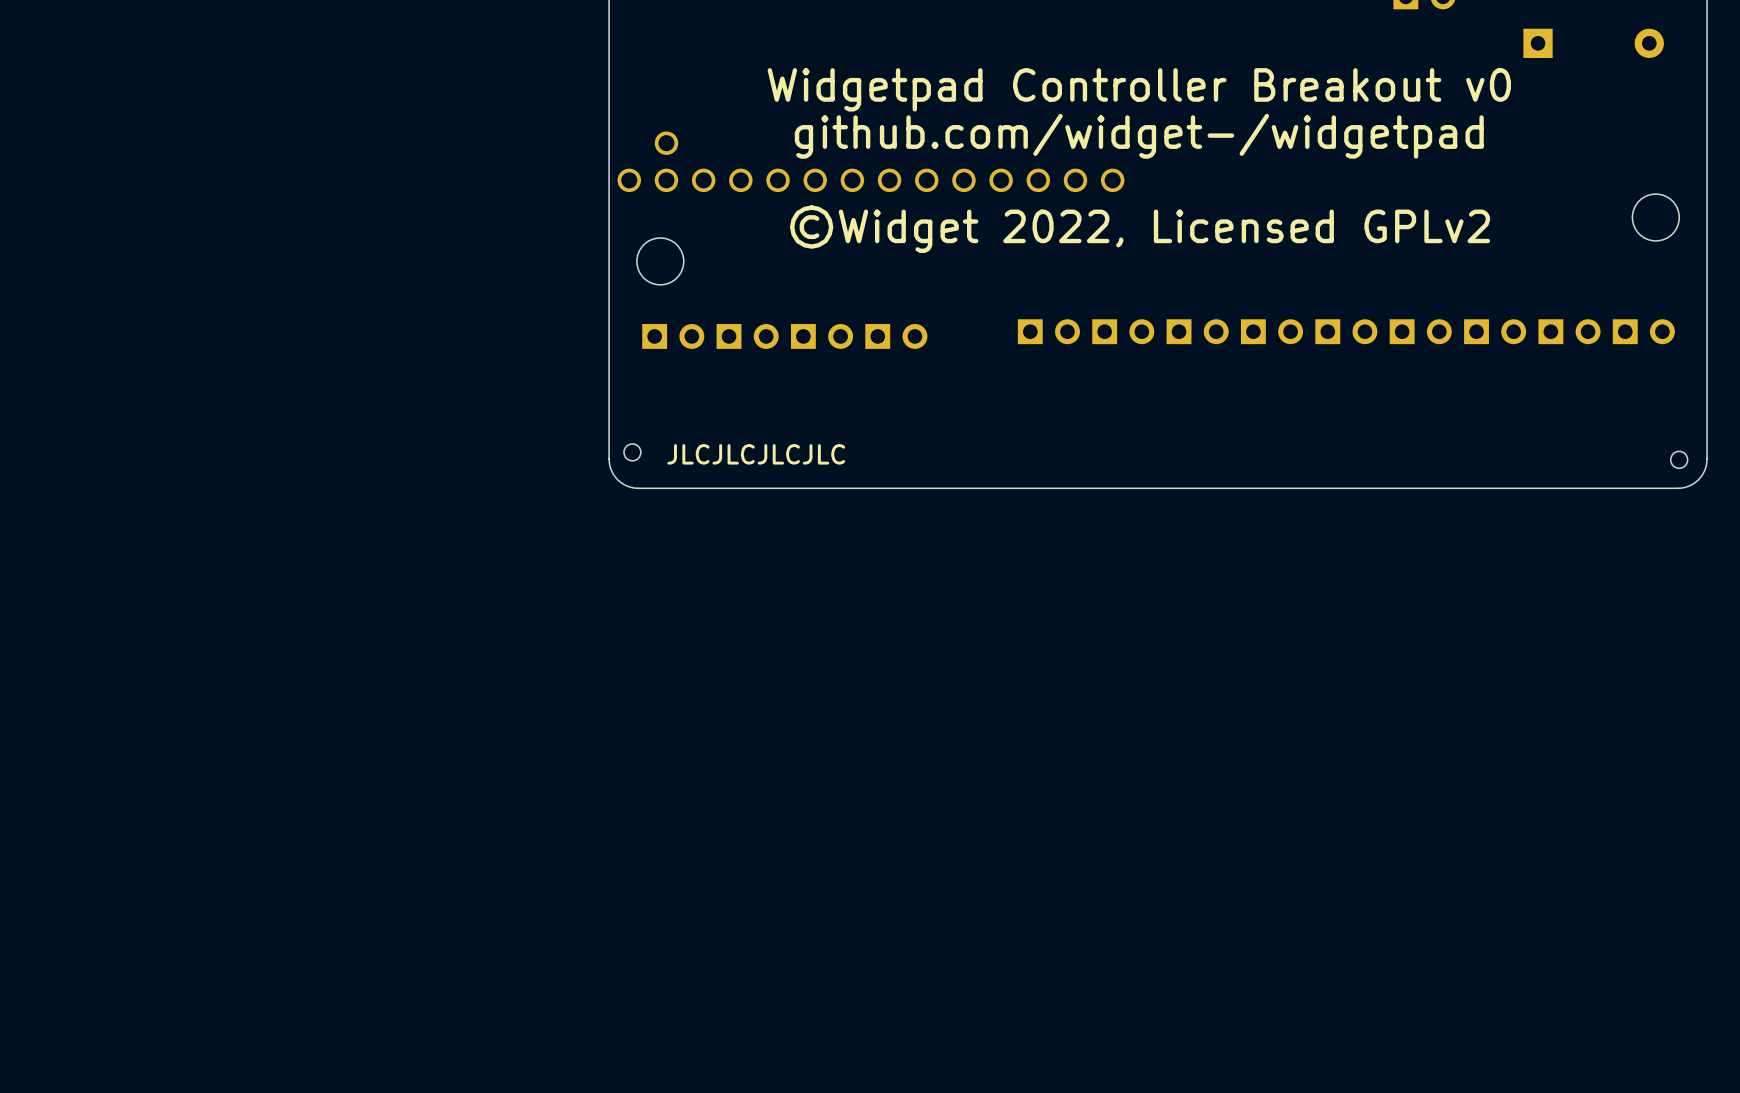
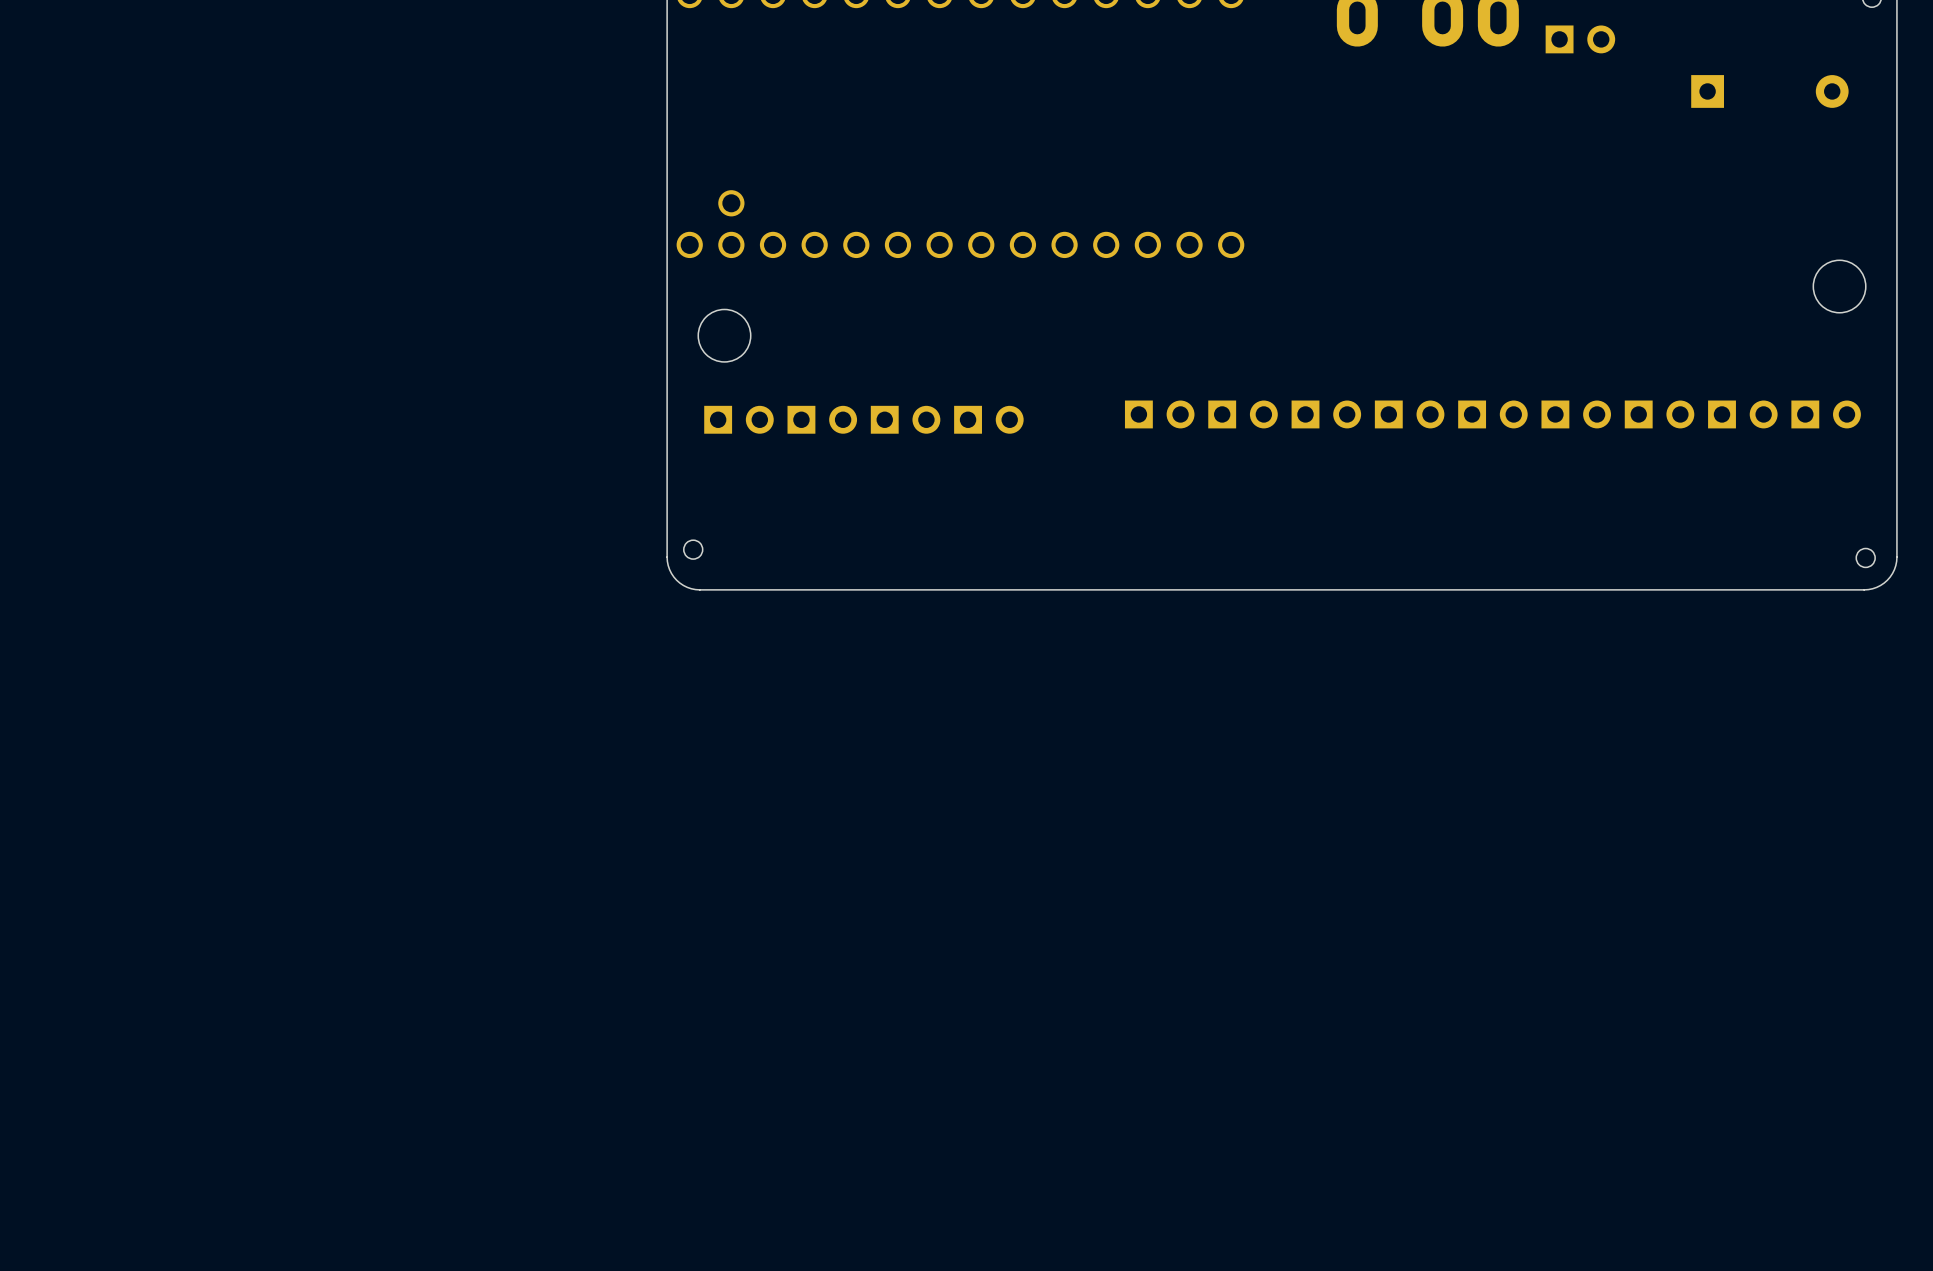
text: Widgetpad Controller Breakout v0 (1139, 89) -> none
text: github.com/widget-/widgetpad (1139, 136) -> none
text: ©Widget 2022, Licensed GPLv2 (1139, 229) -> none
text: JLCJLCJLCJLC (756, 454) -> none

